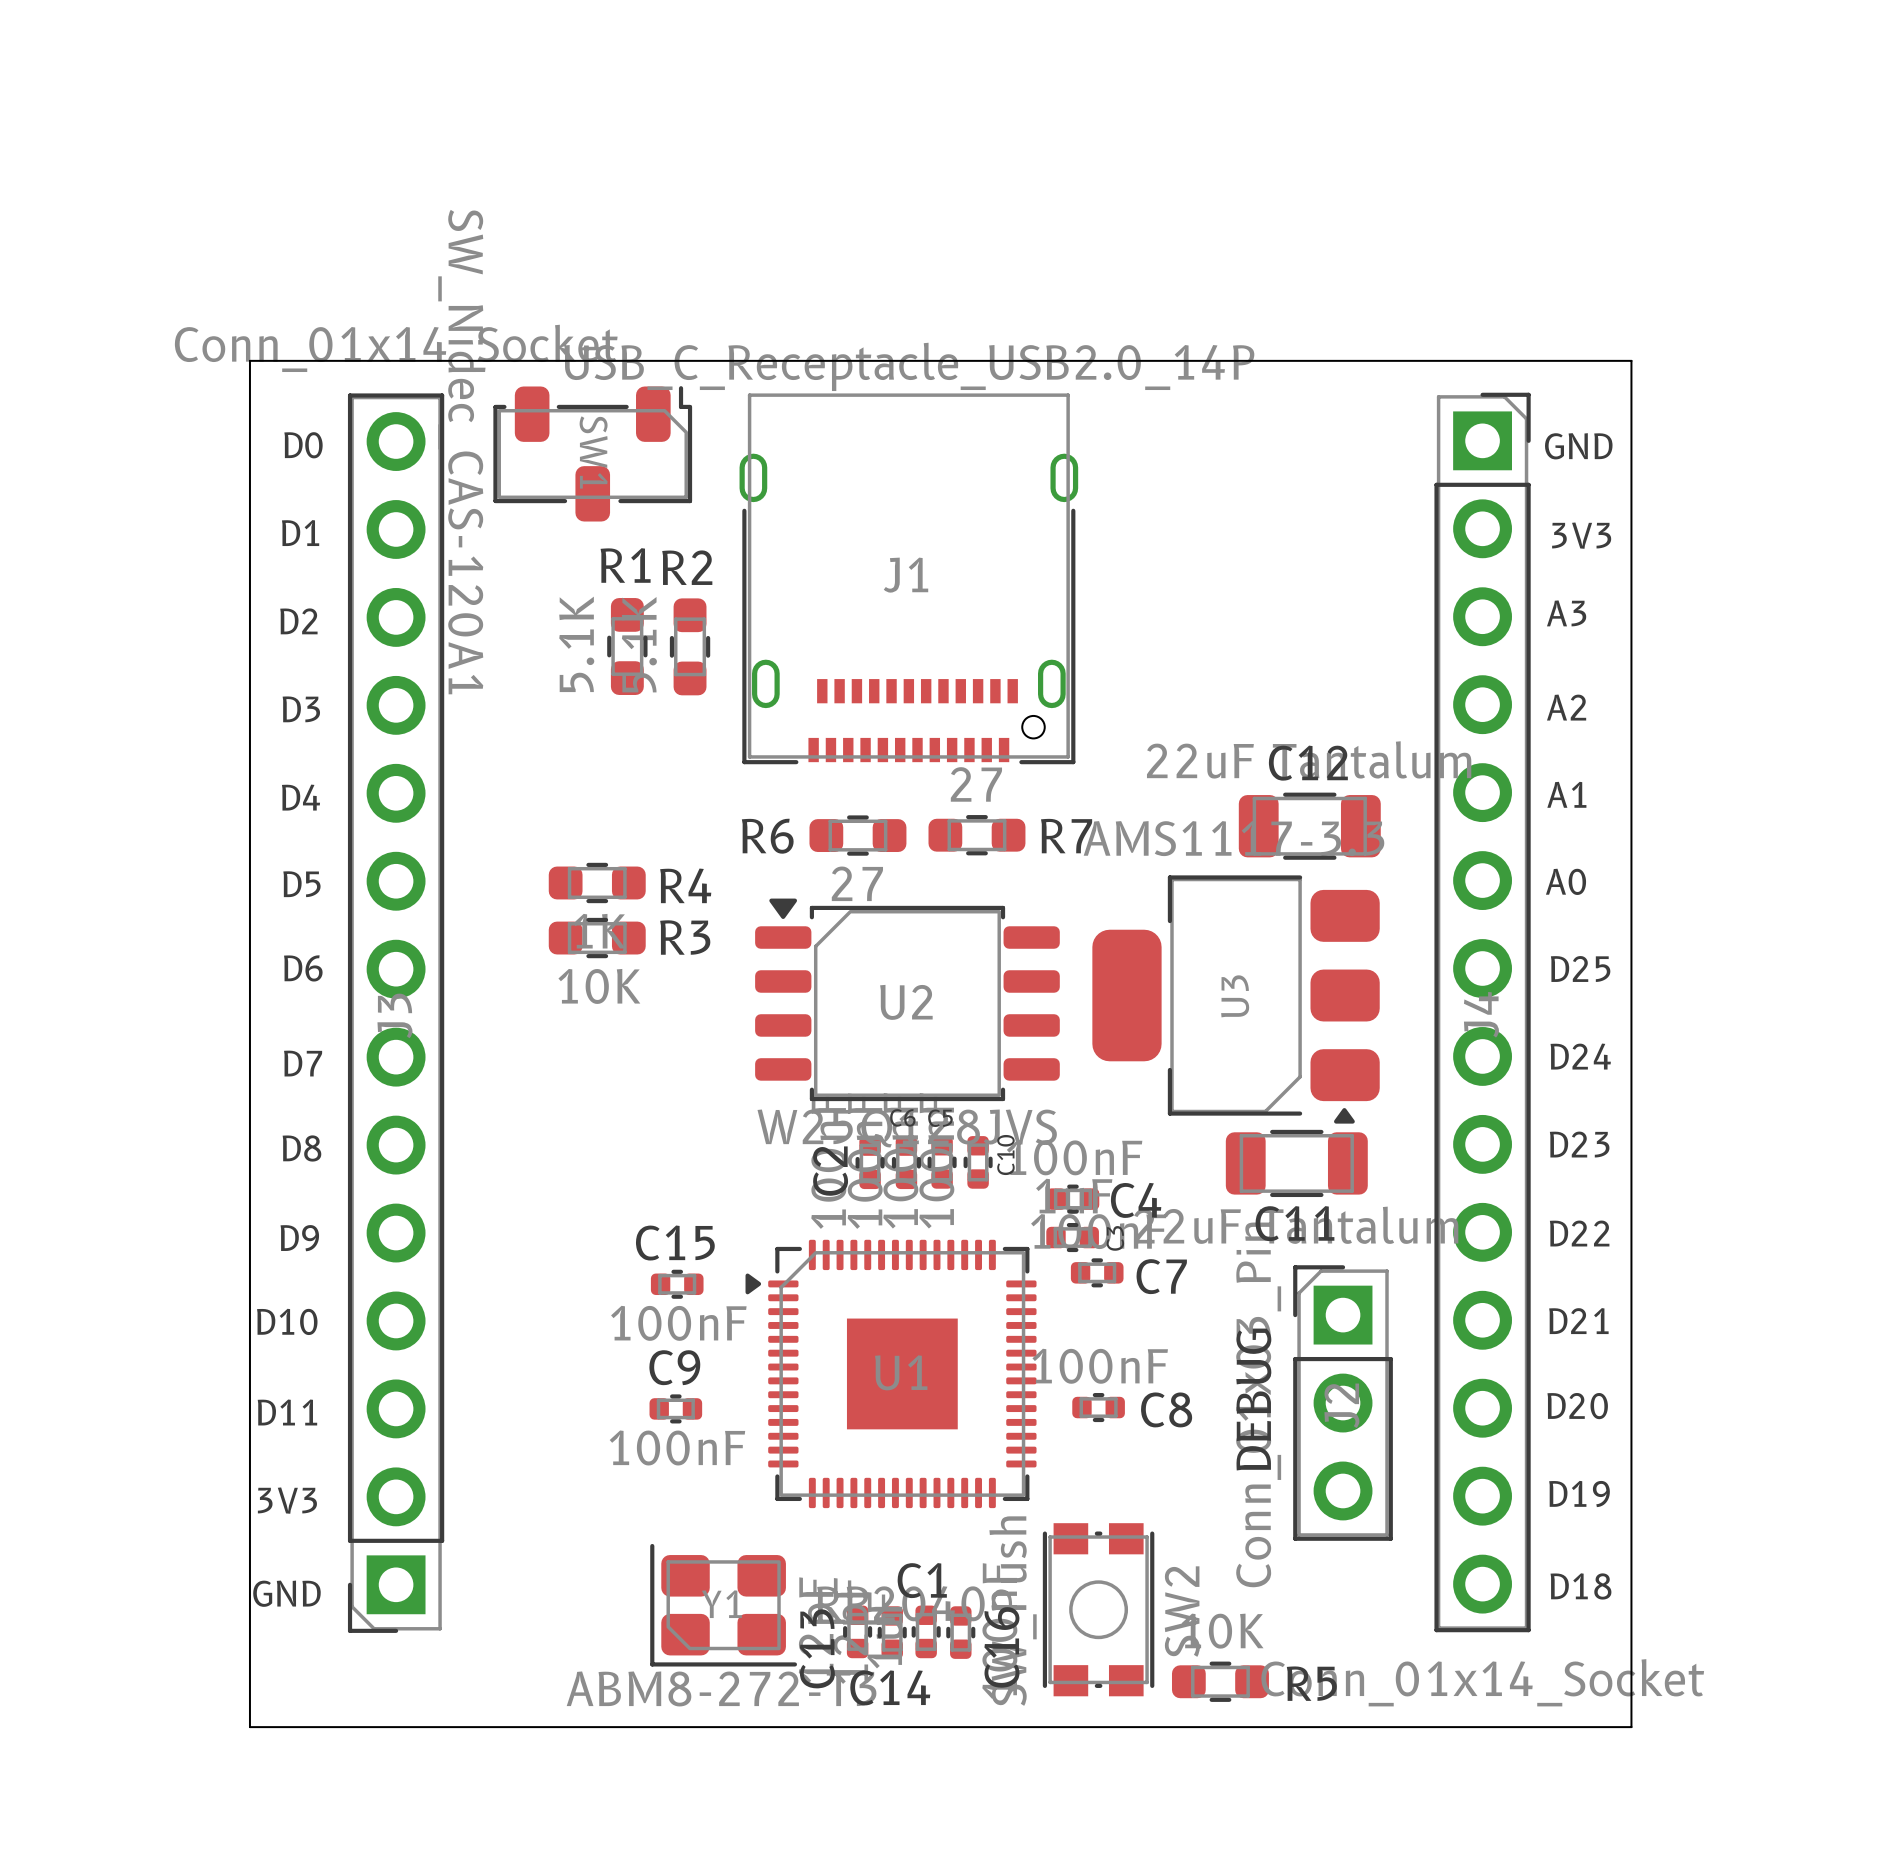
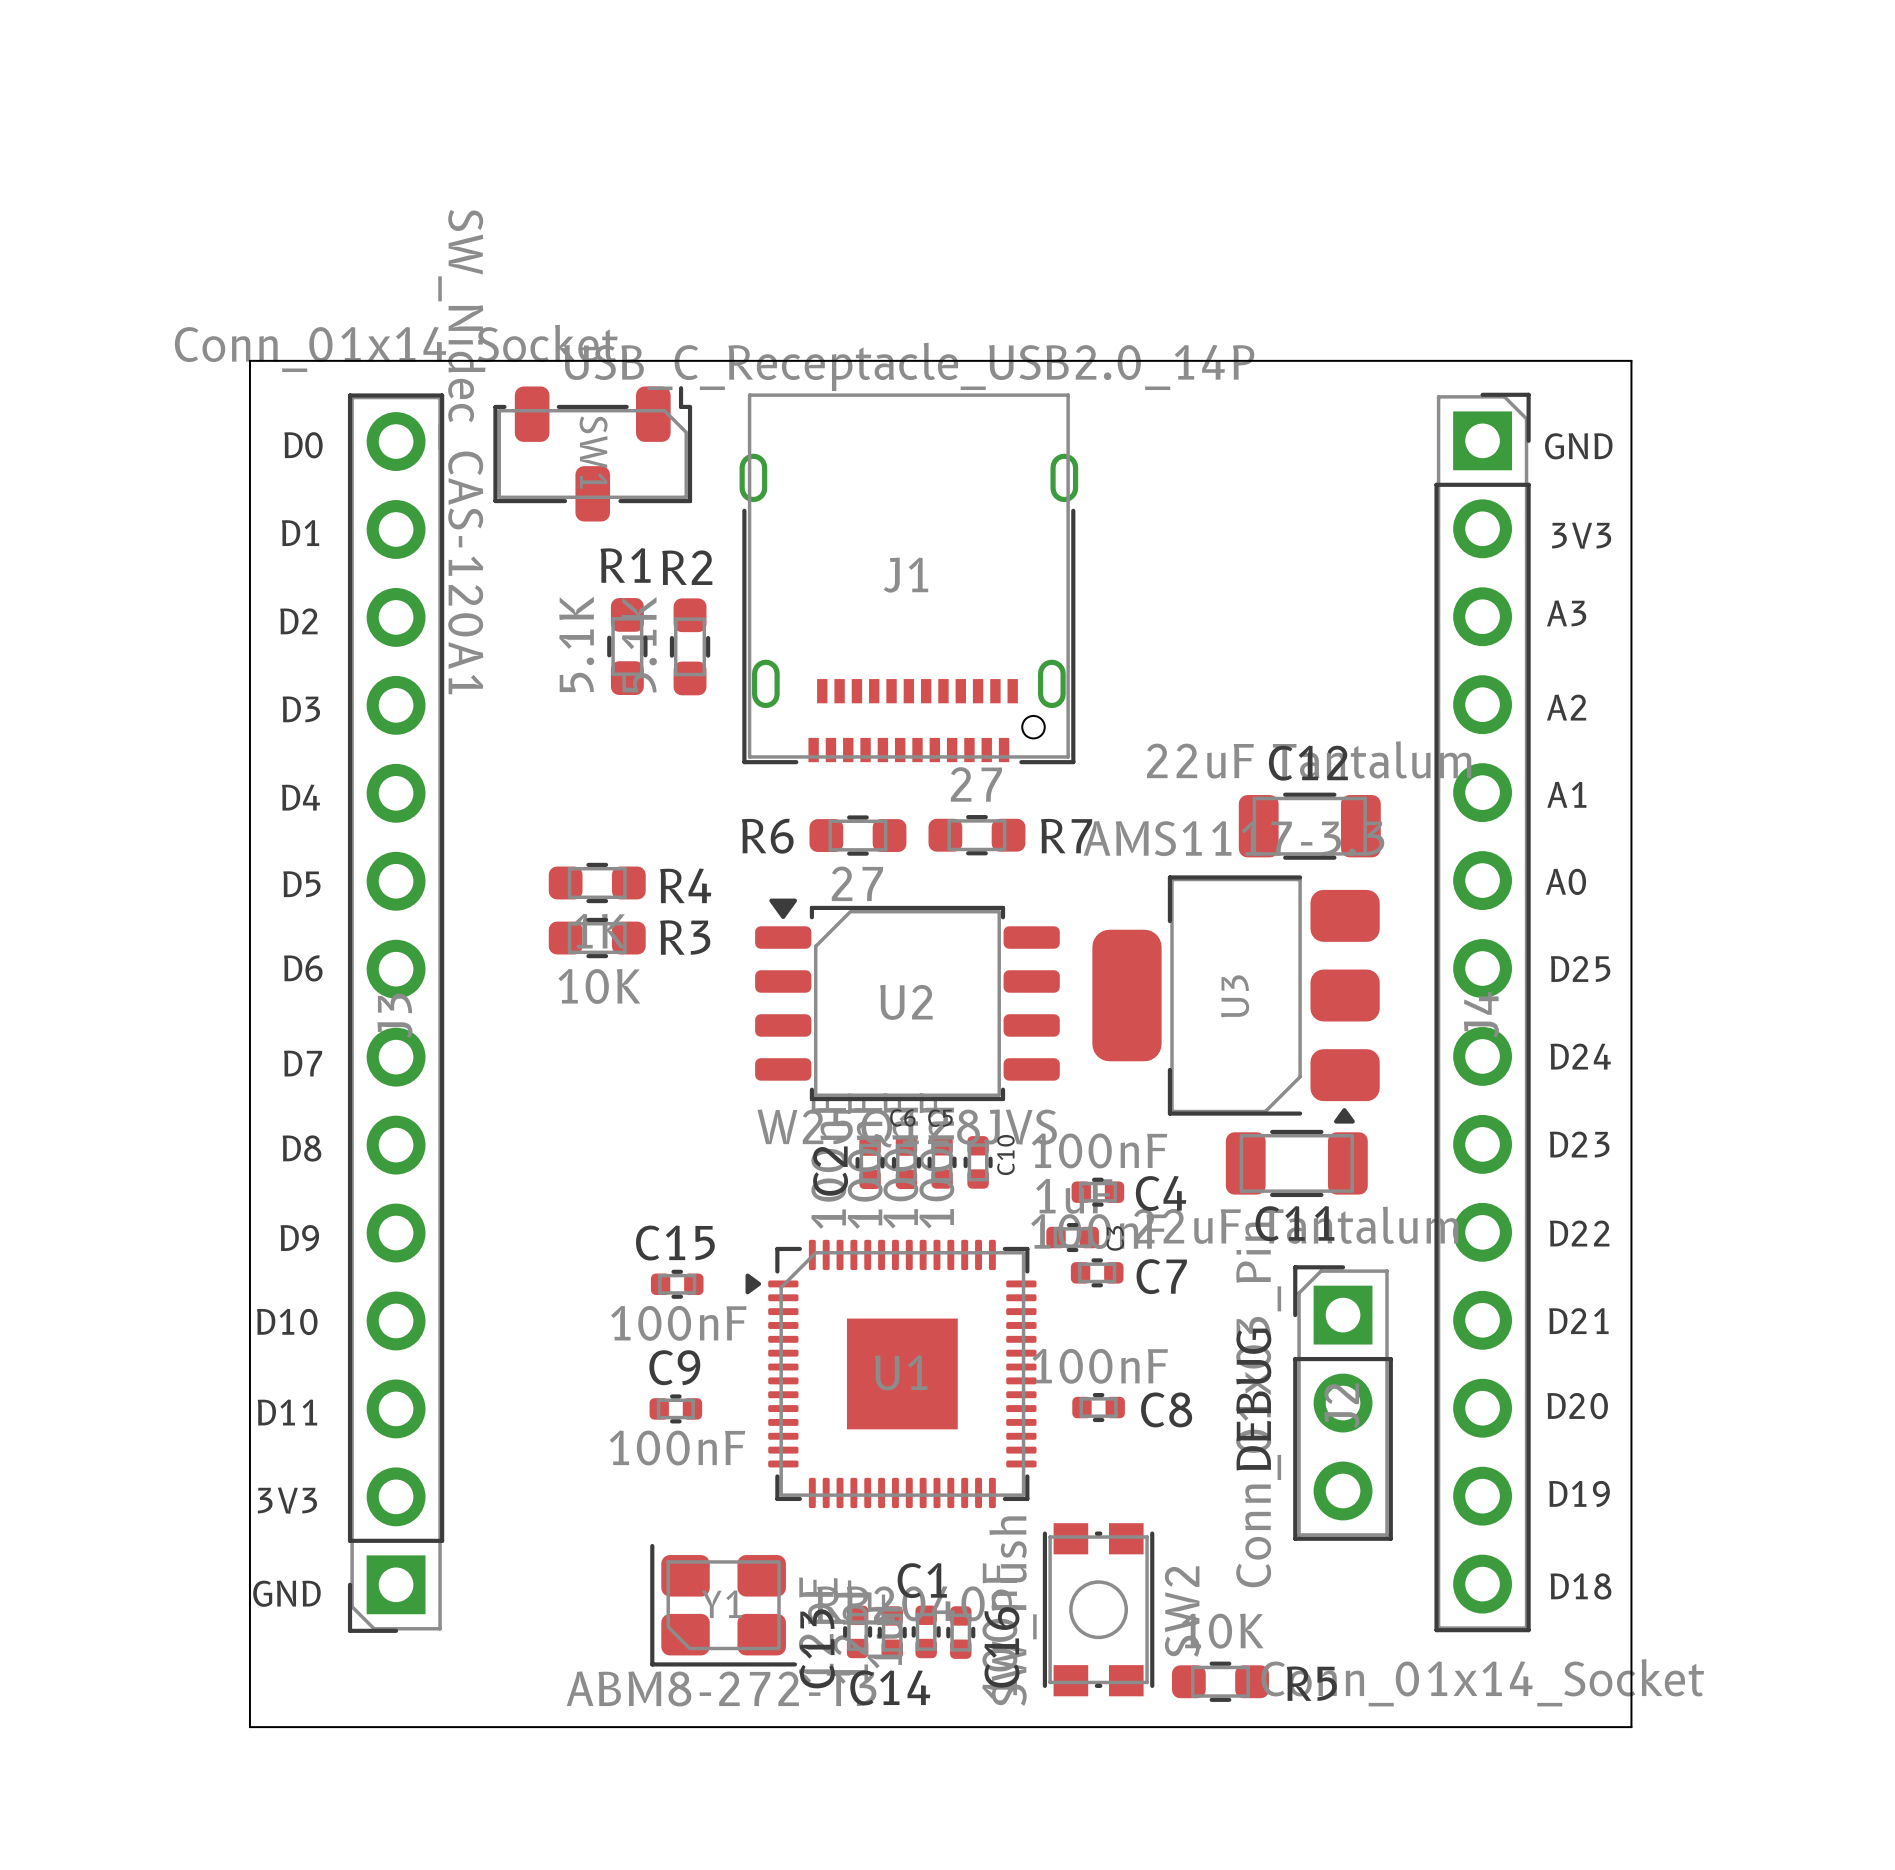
C4 position: (1072, 1199) -> (1097, 1192)

